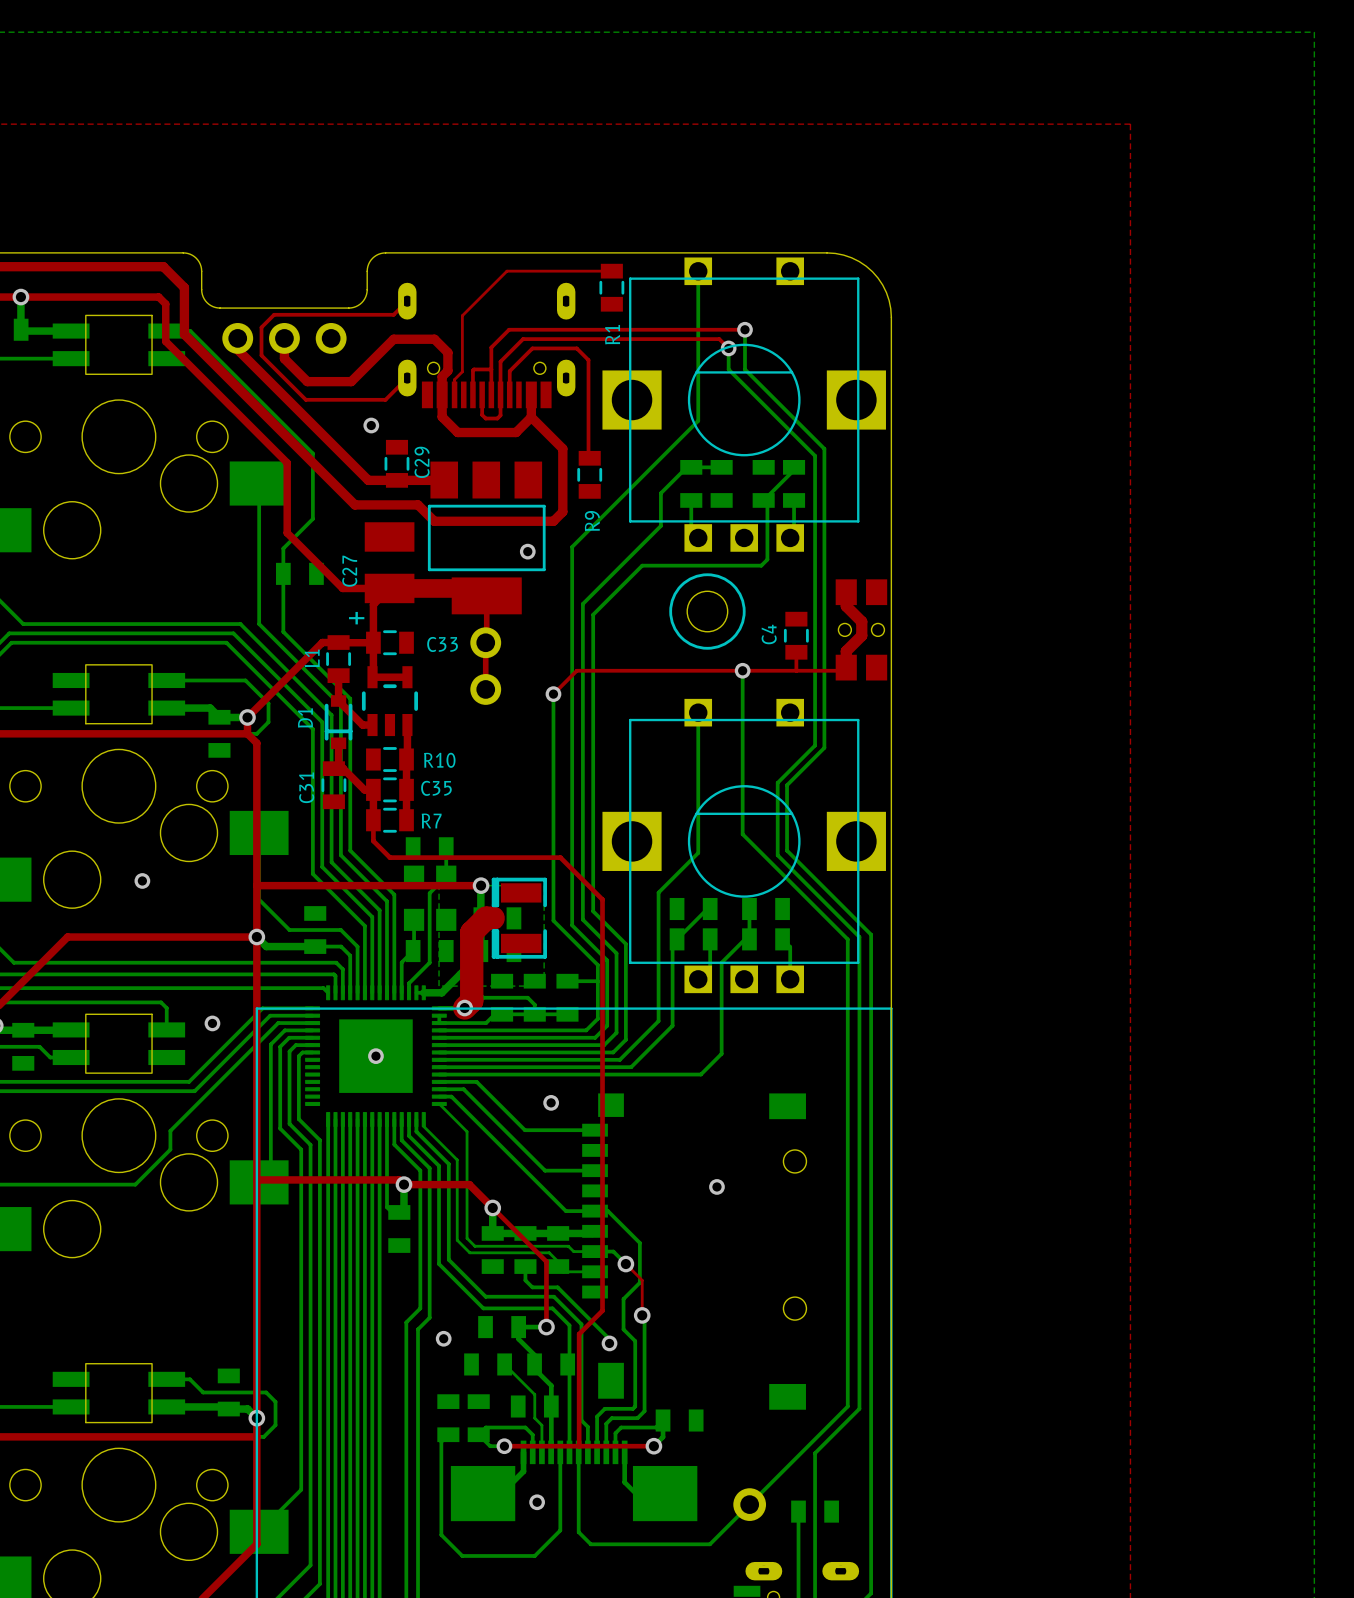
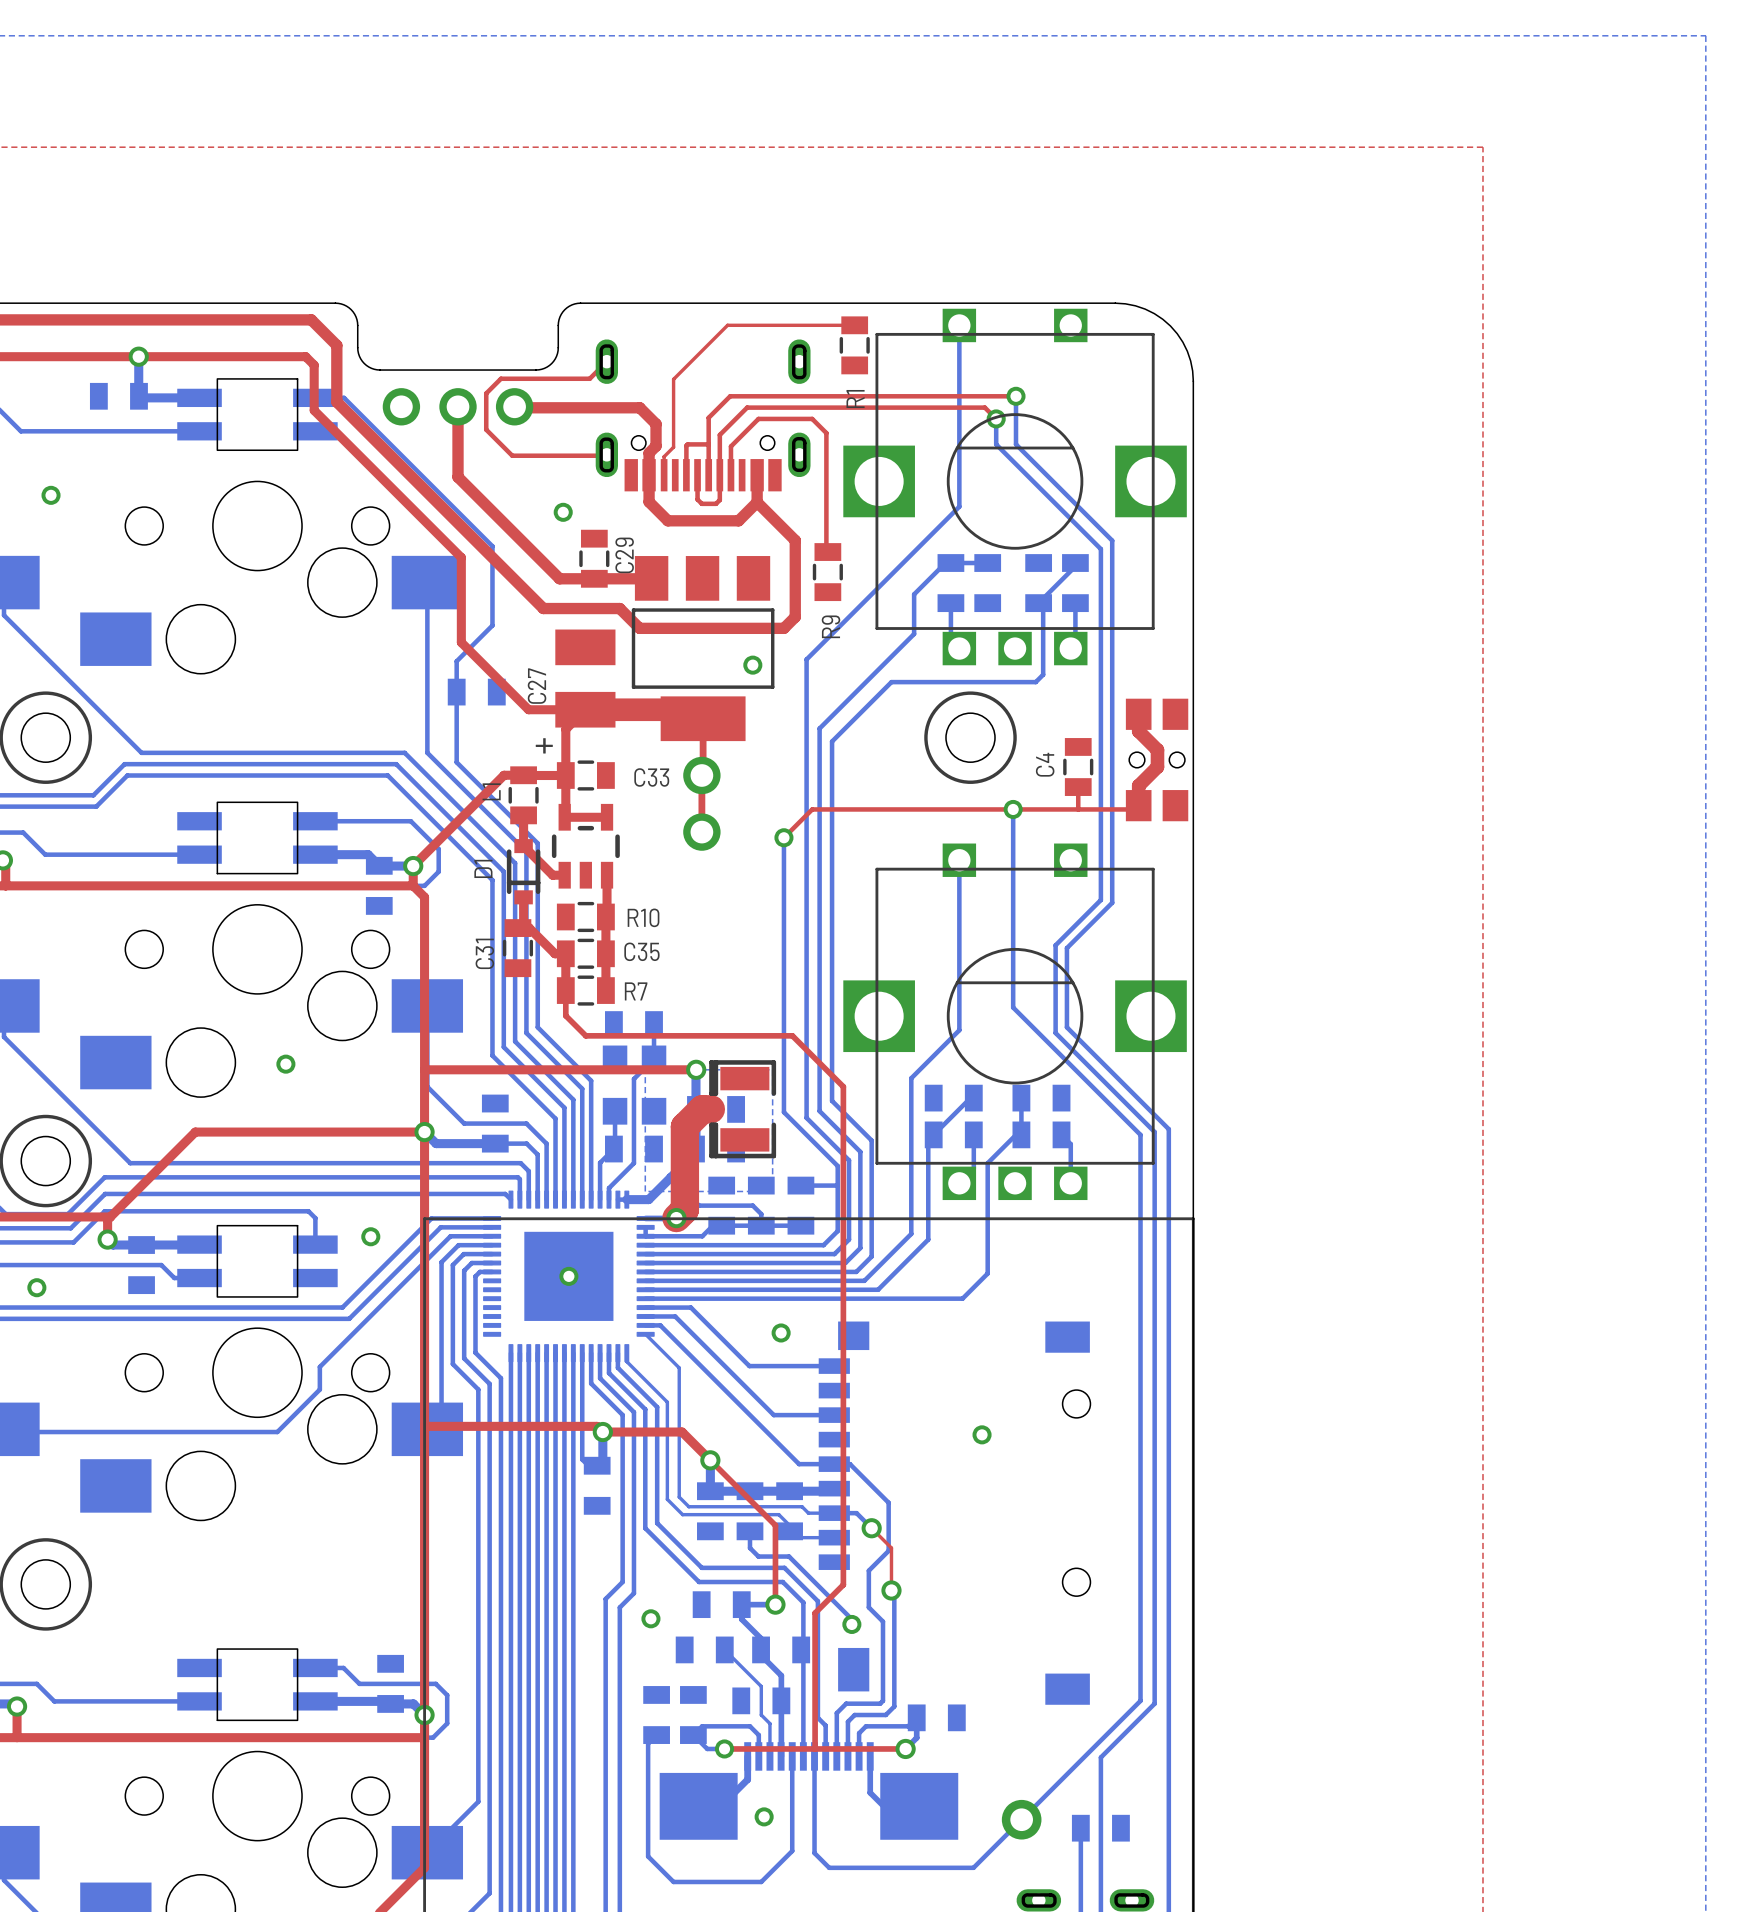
top track: (393, 314) (274, 314) (261, 327) (261, 355) (305, 399) (385, 399) (406, 378) -> (590, 378) (500, 378) (486, 393) (486, 429) (512, 455) (605, 455)
top track: (237, 338) (237, 349) (284, 396) -> (458, 431) (458, 477)
top track: (393, 339) (351, 381) (307, 381) (284, 358) -> (590, 407) (514, 406)

